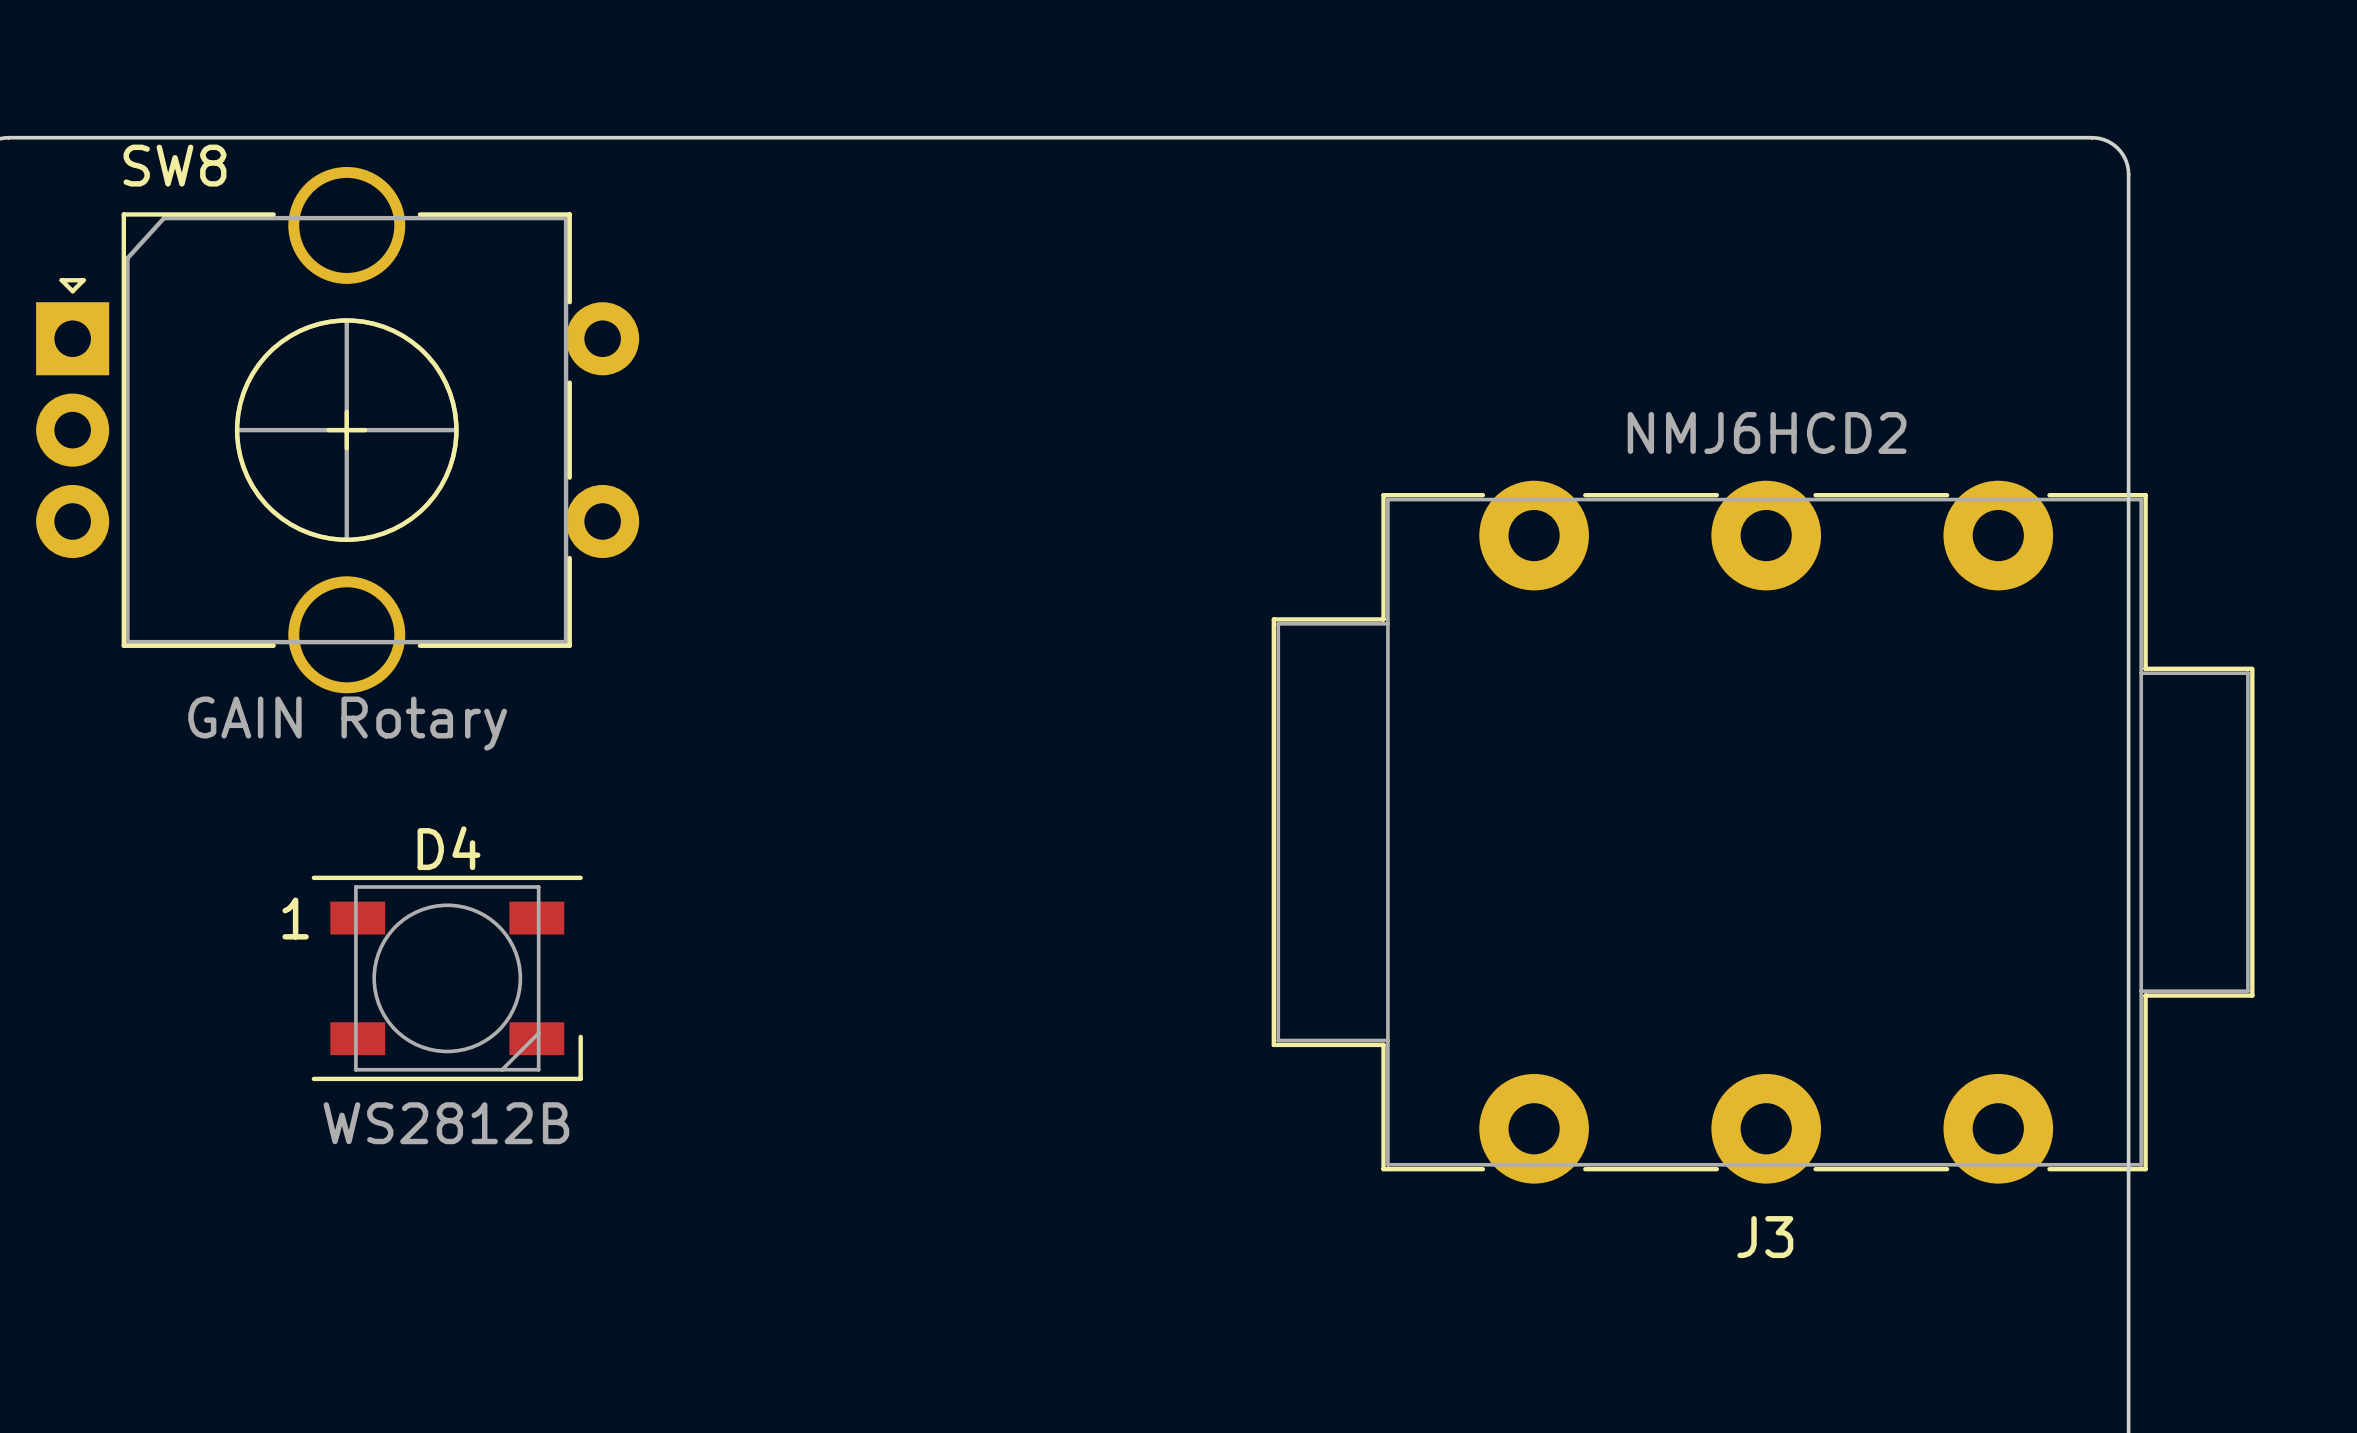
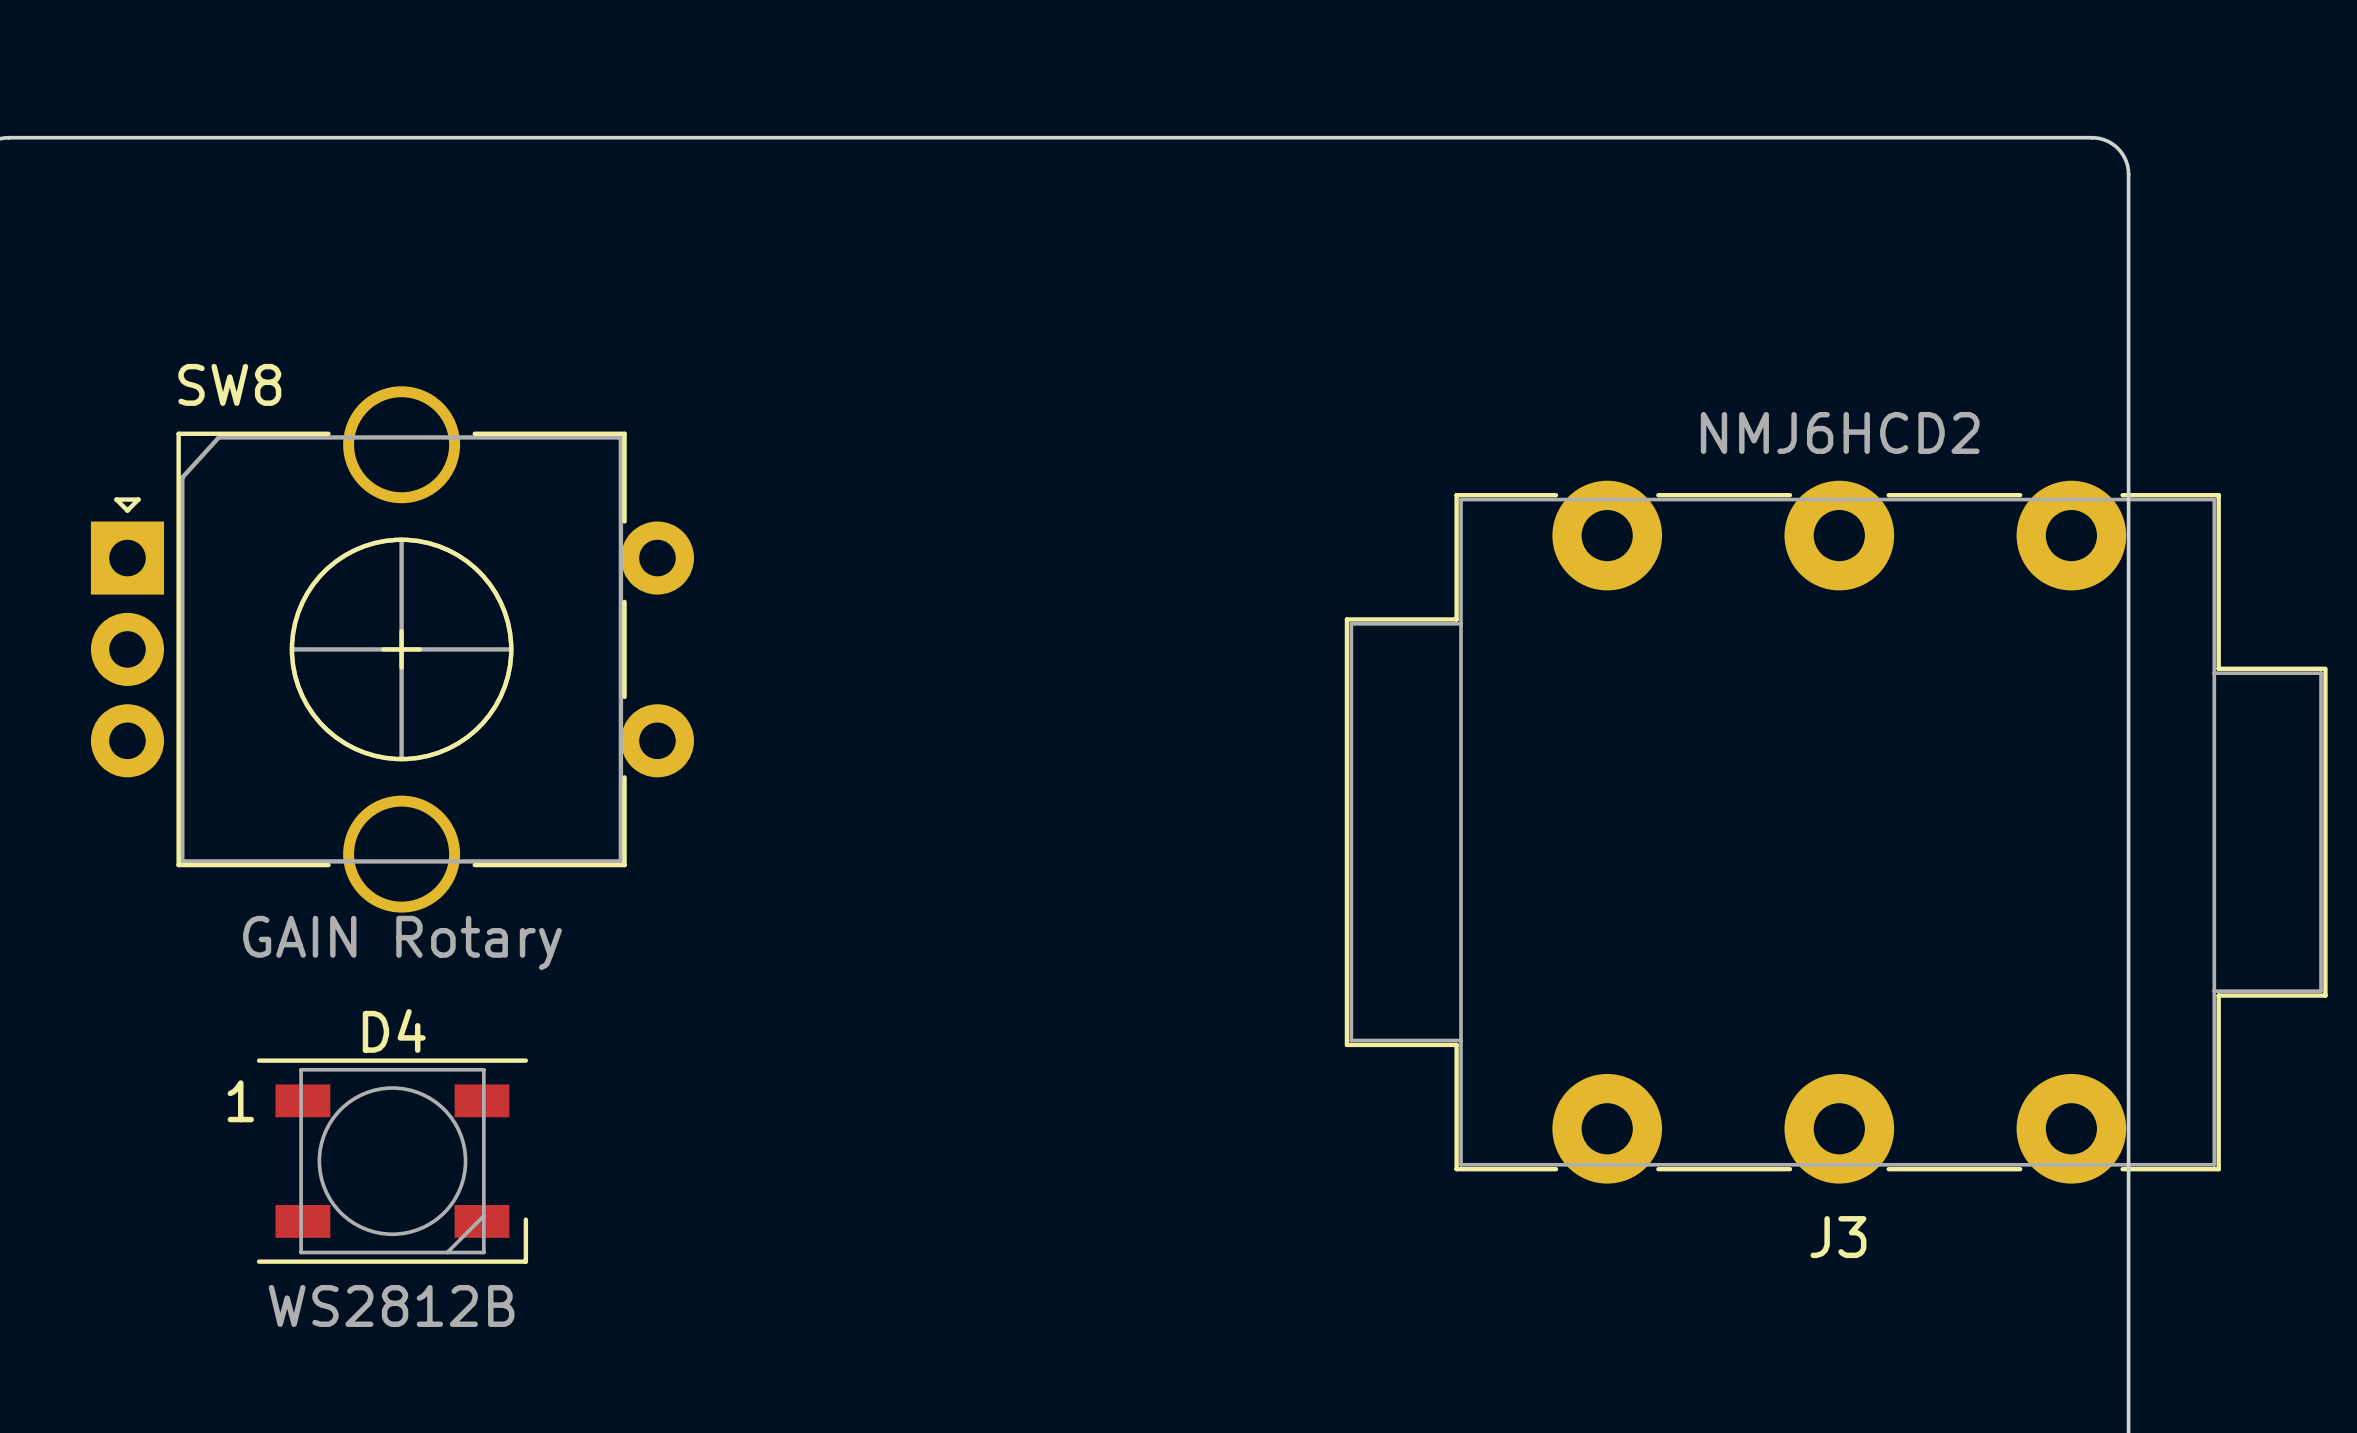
SW8 position: (337, 430) -> (392, 649)
J3 position: (1763, 832) -> (1836, 832)
D4 position: (447, 978) -> (392, 1161)

